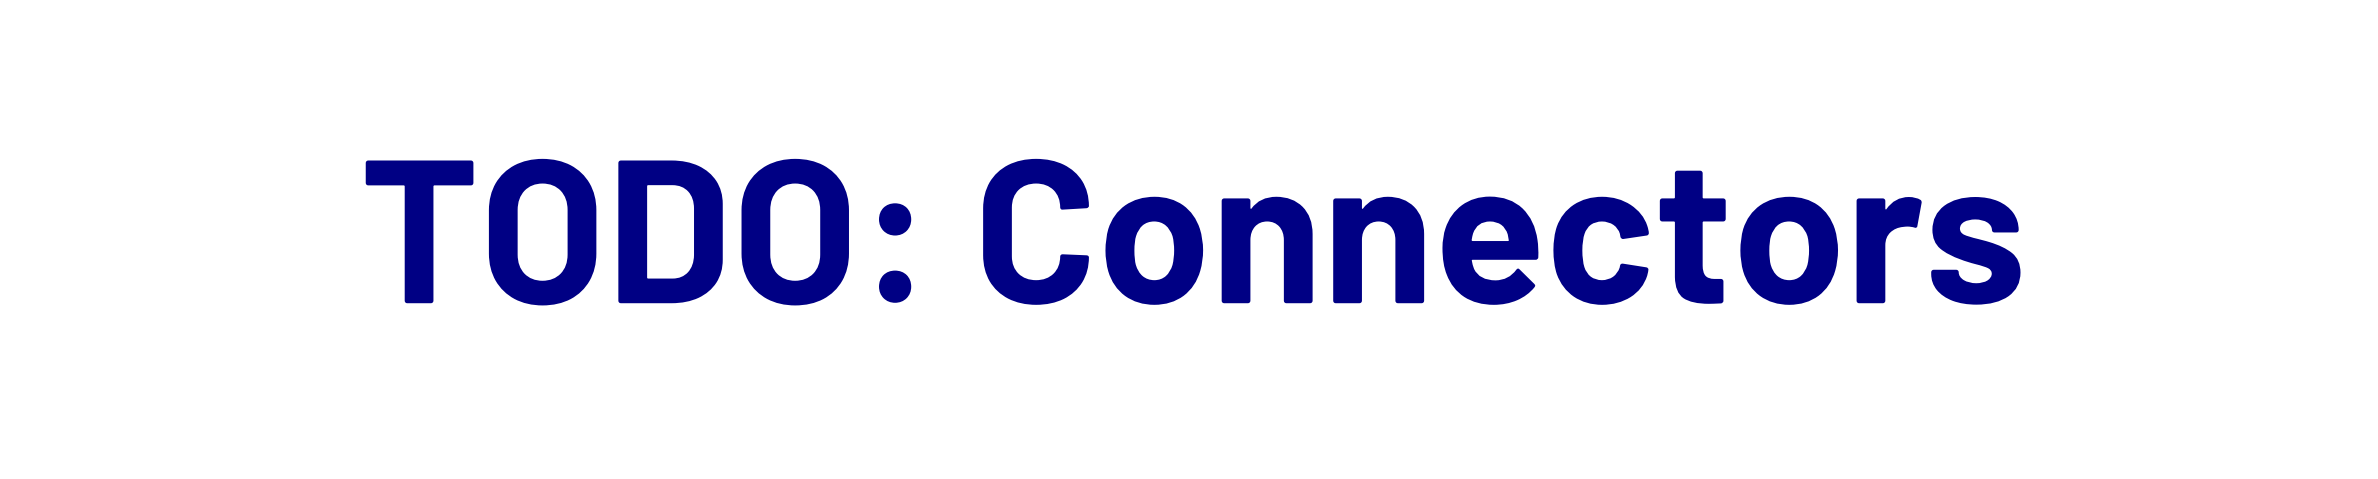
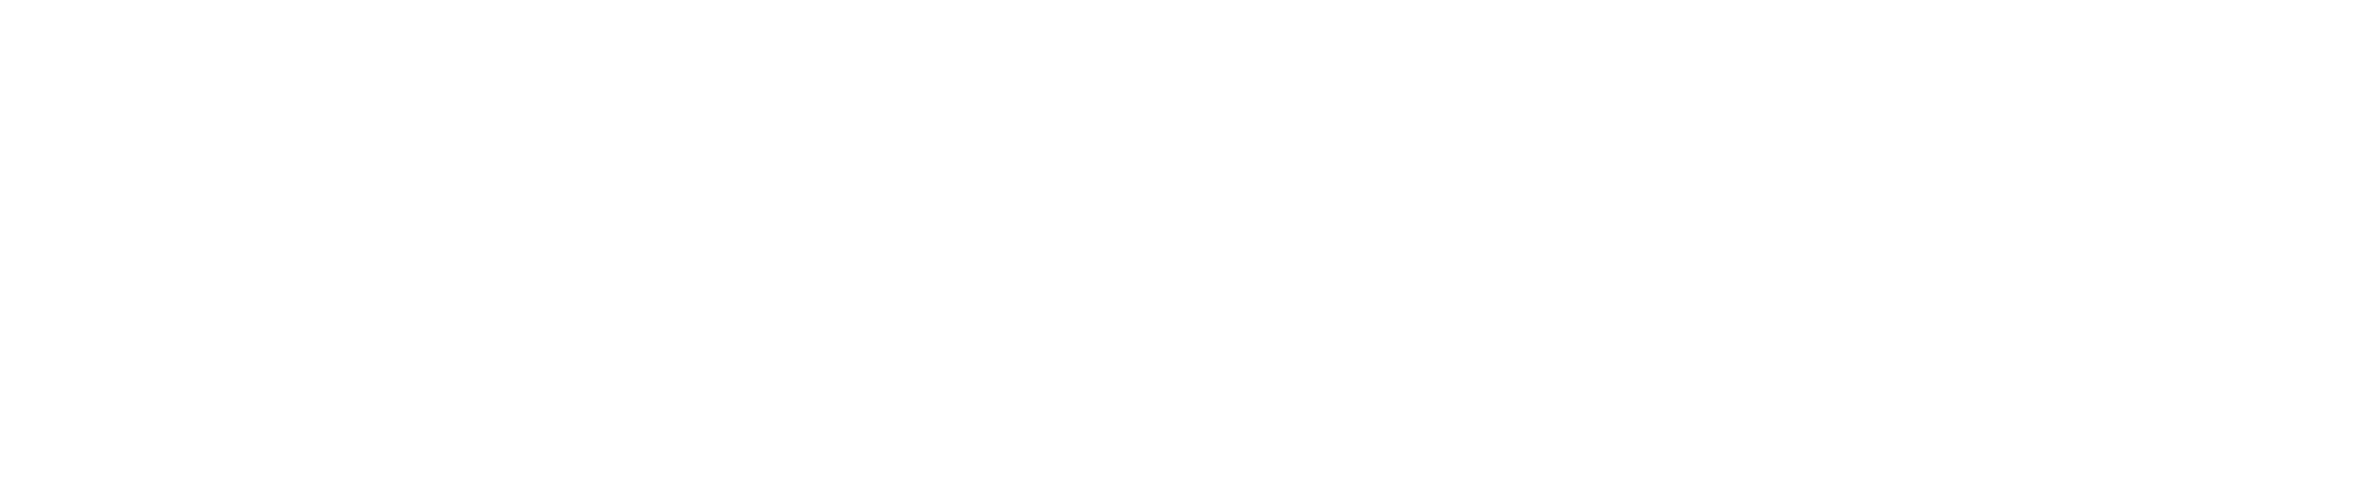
text: TODO: Connectors (1193, 232) -> none

